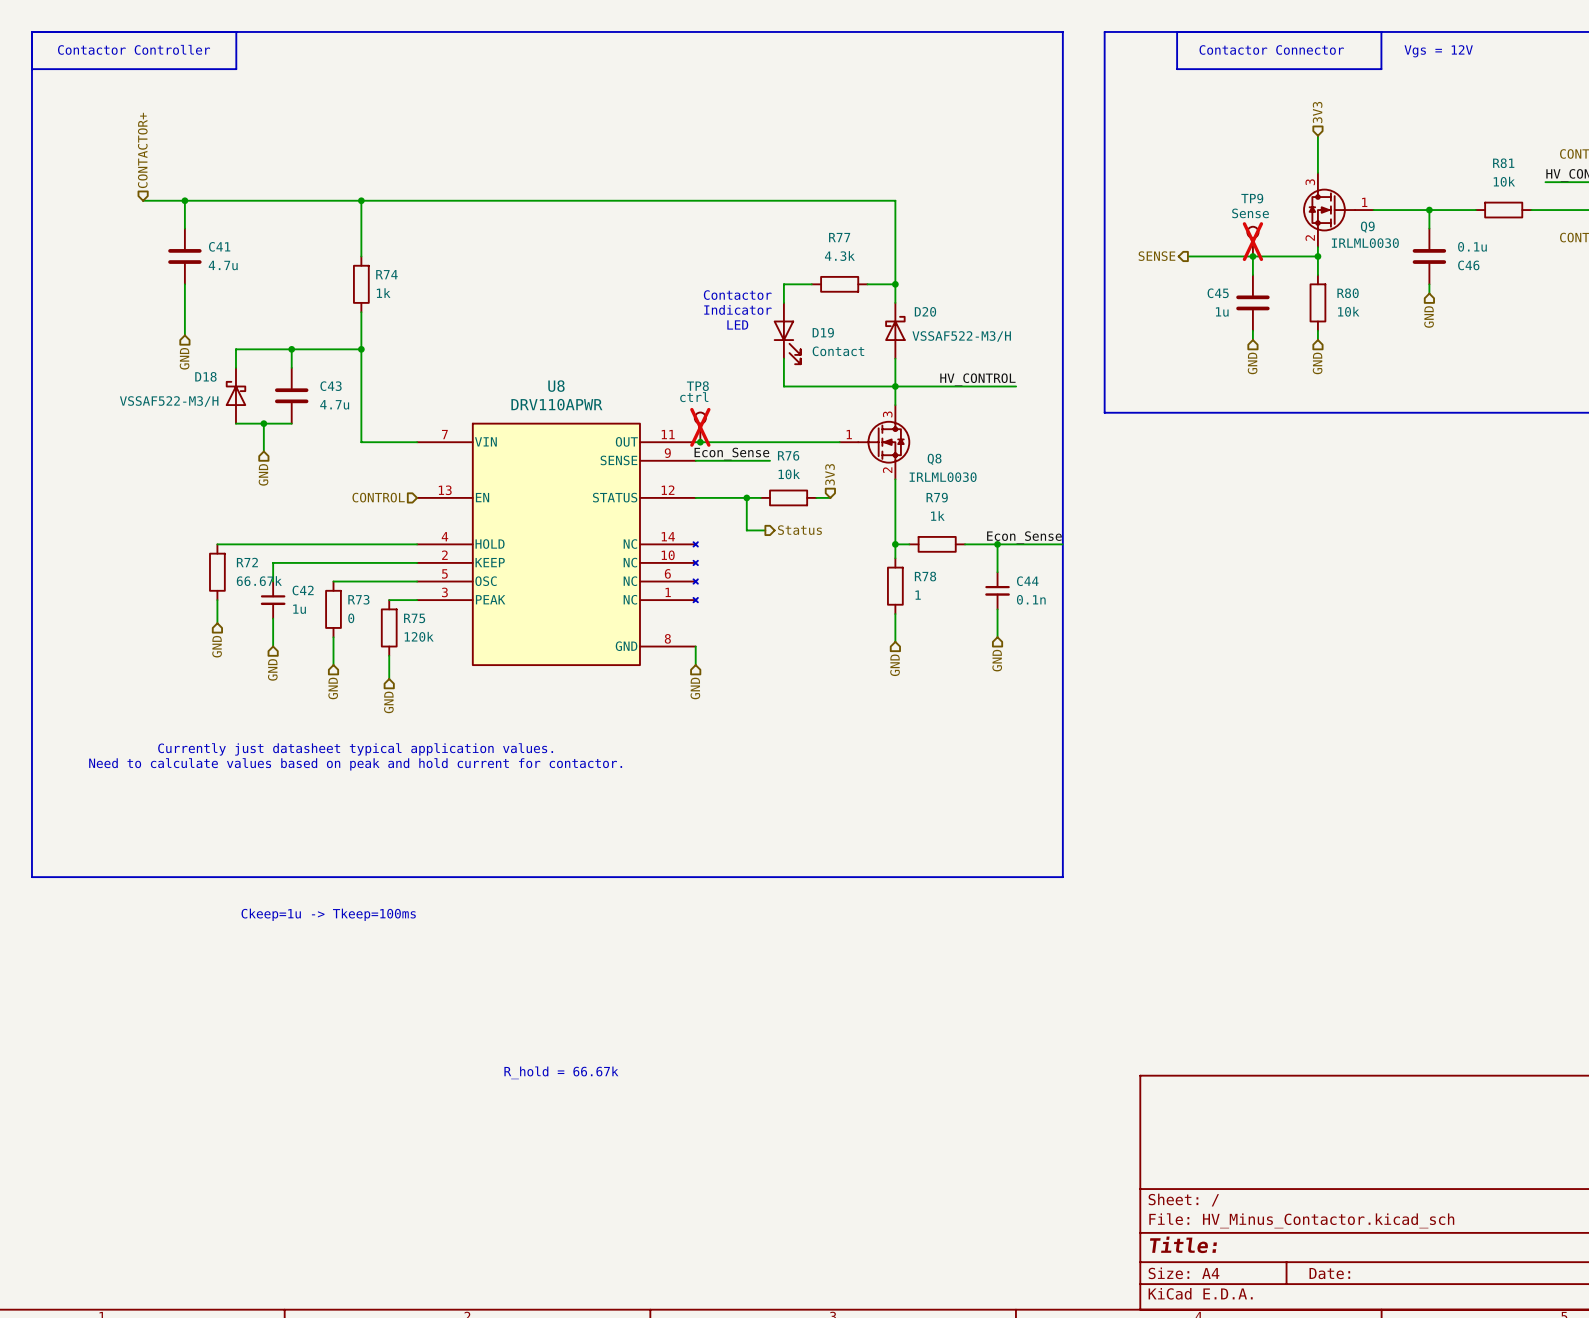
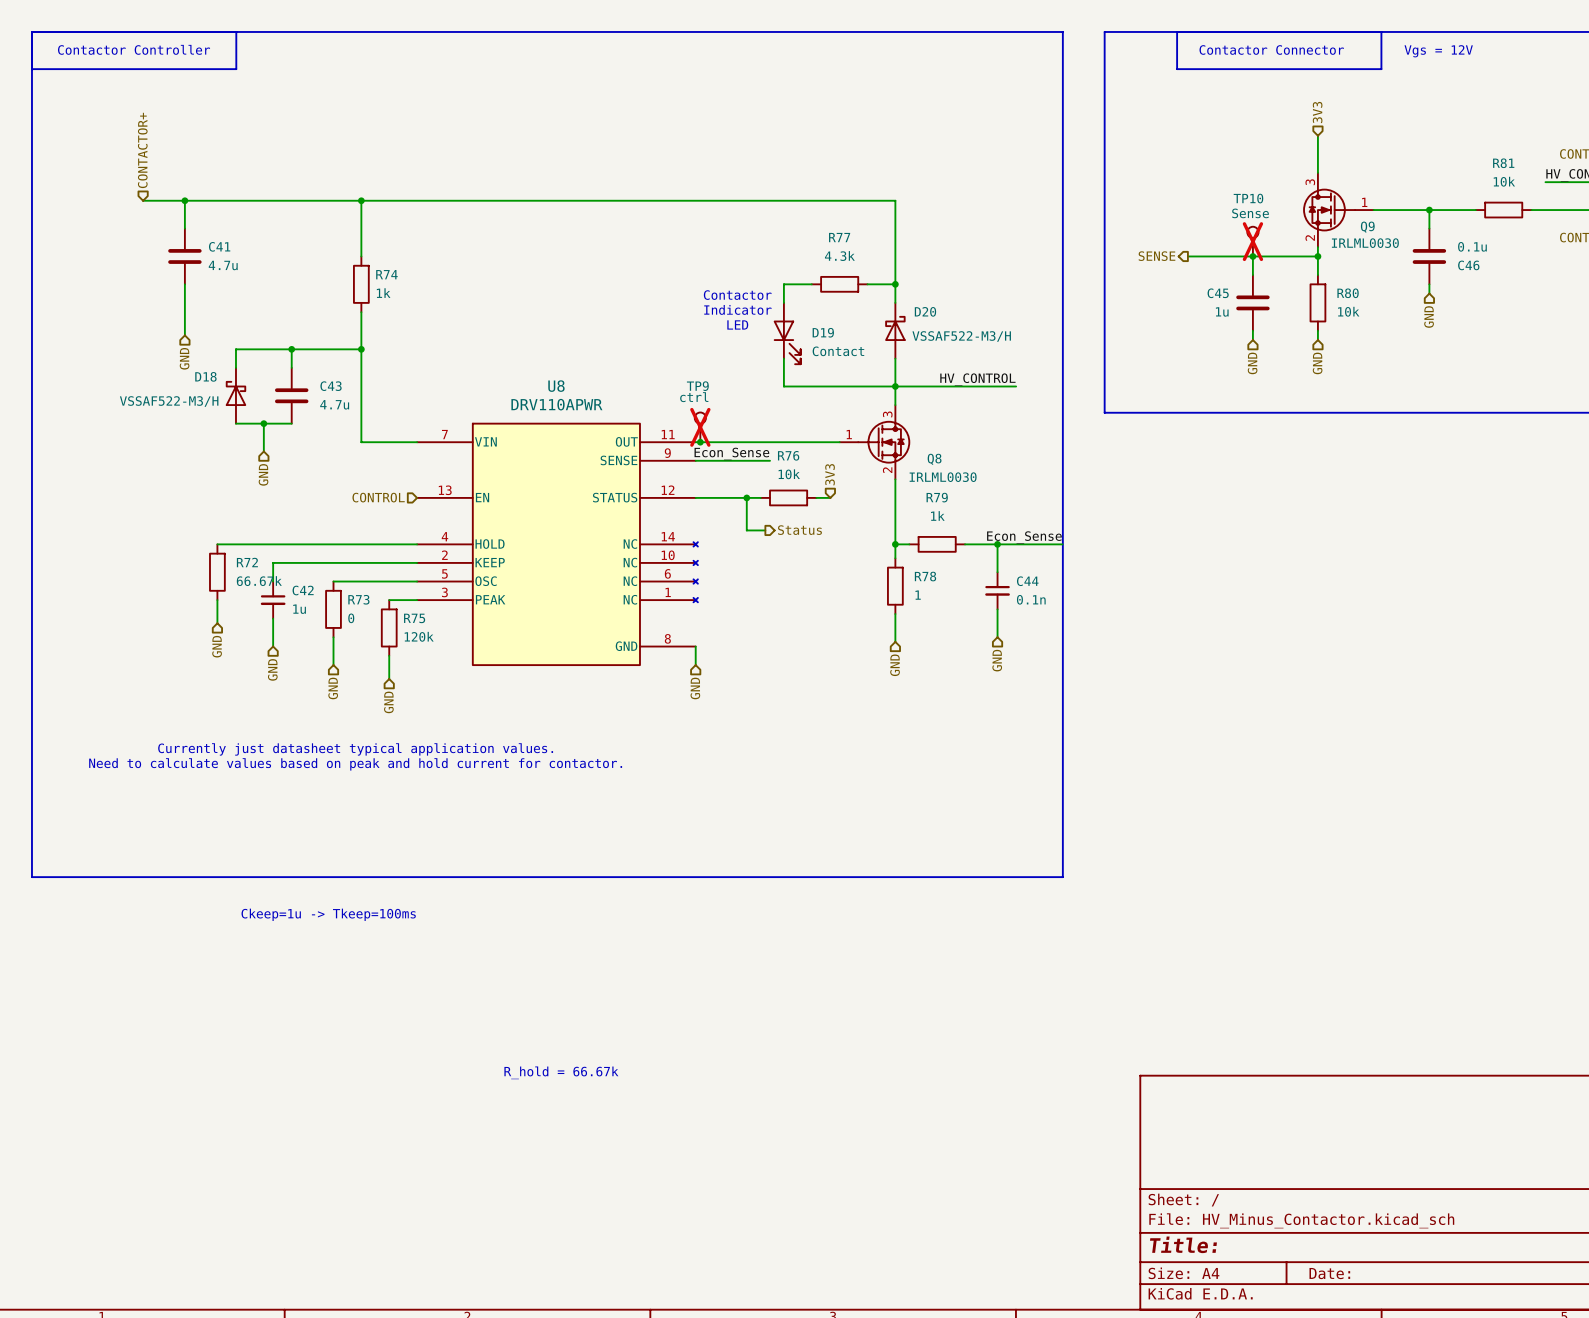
TP9 name: TP9 (1252, 198) -> TP10 (1248, 198)
TP8 name: TP8 (697, 386) -> TP9 (697, 386)

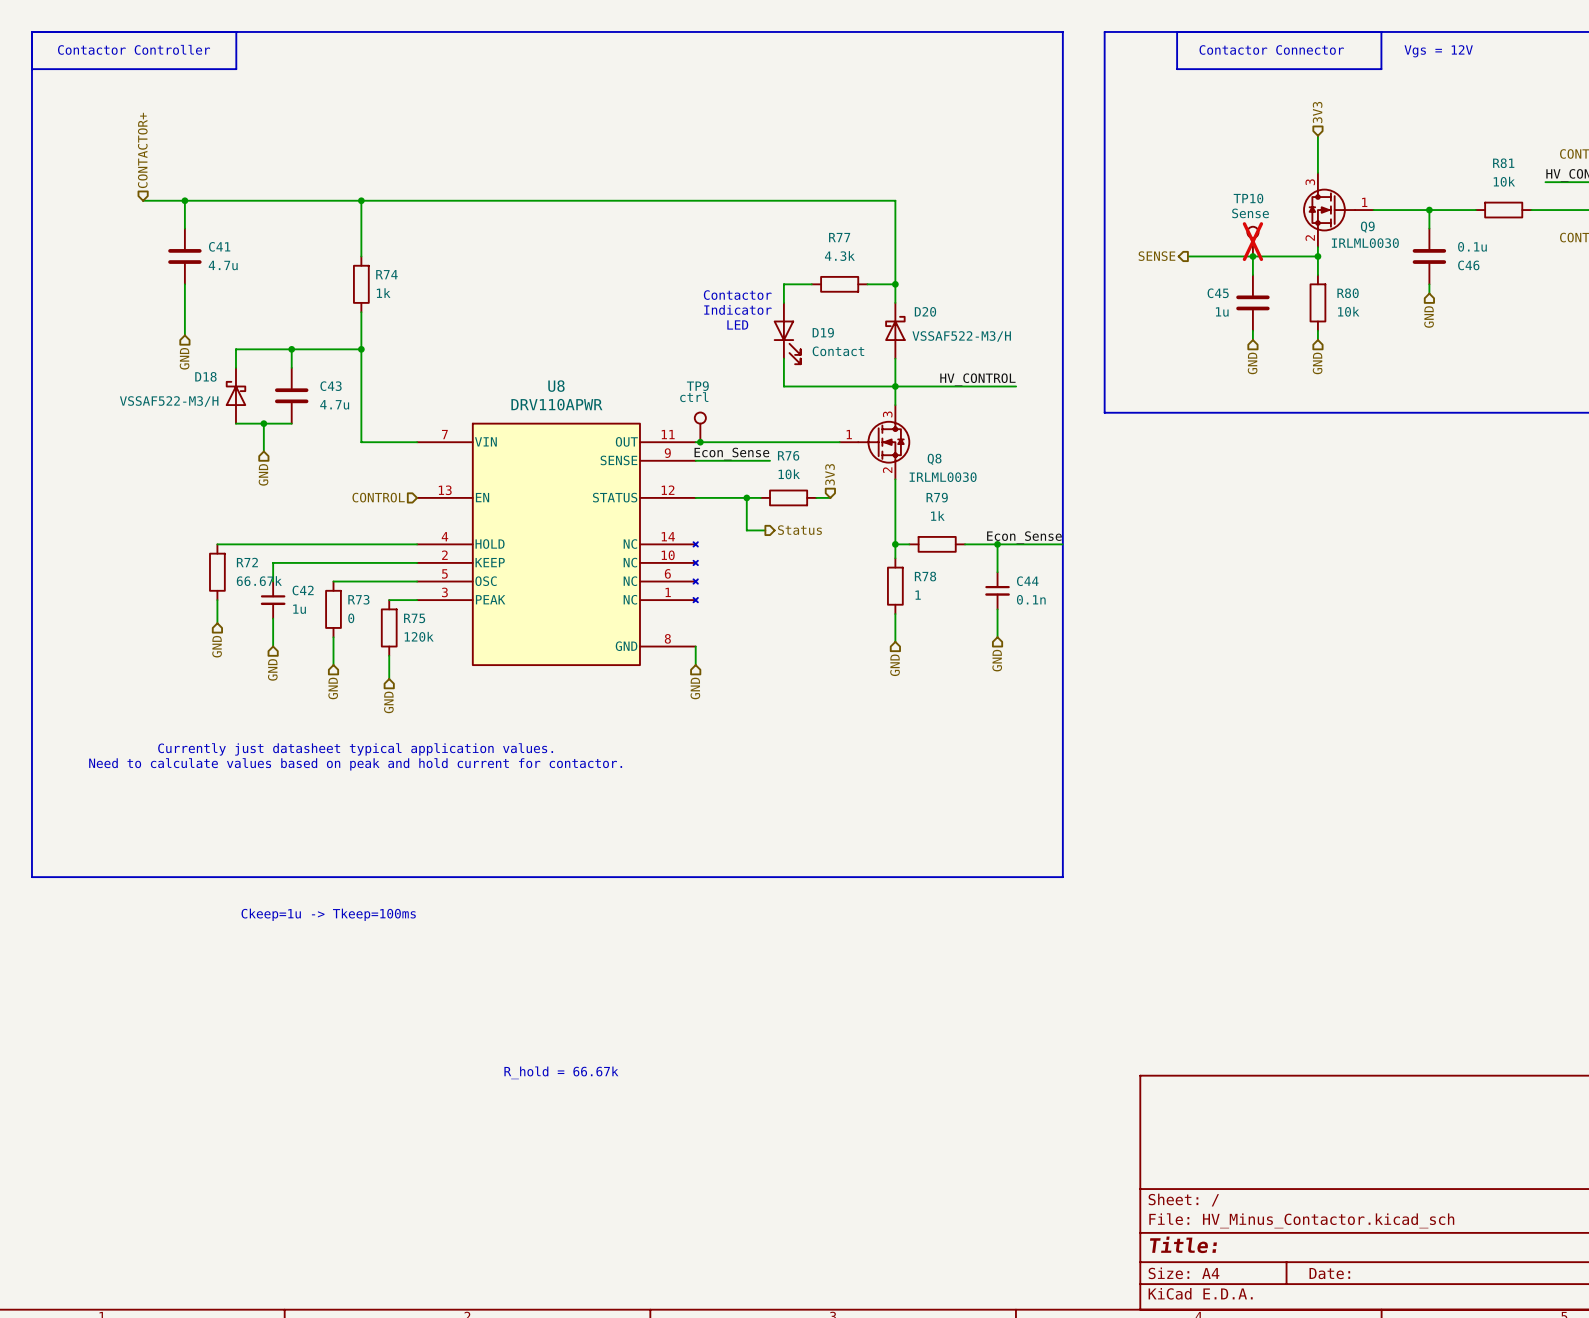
TP9 do-not-place cross: (700, 427) -> none

